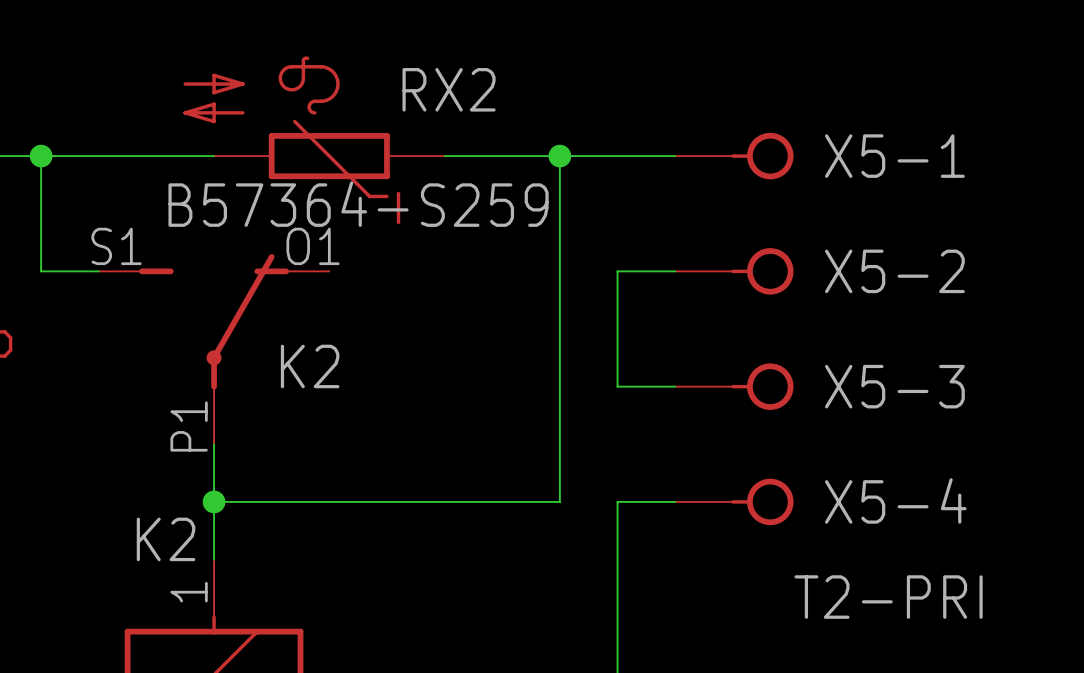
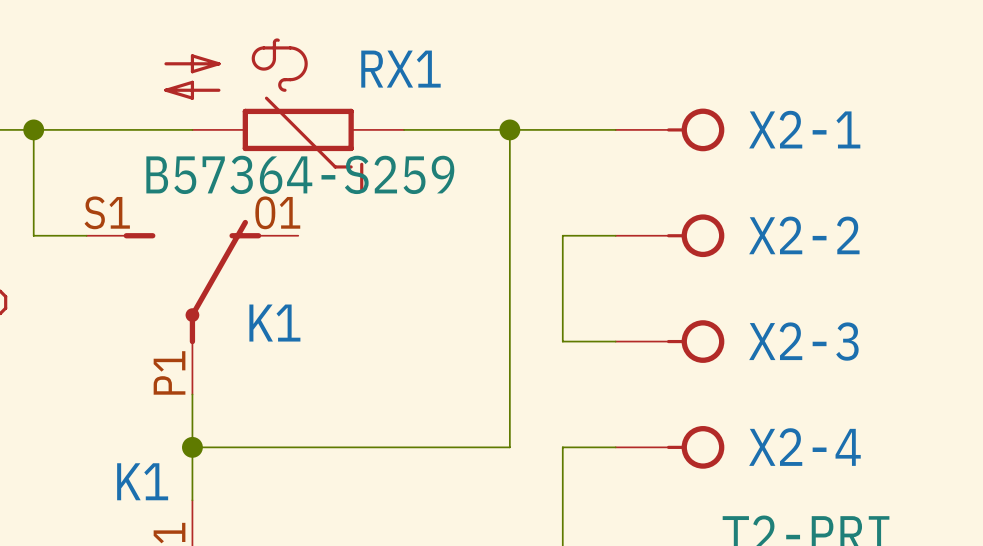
RX2 name: RX2 (449, 89) -> RX1 (400, 69)
X5-1 name: X5-1 (894, 156) -> X2-1 (804, 129)
X5-2 name: X5-2 (894, 271) -> X2-2 (804, 235)
K2 name: K2 (310, 366) -> K1 (274, 323)
X5-3 name: X5-3 (894, 386) -> X2-3 (803, 341)
X5-4 name: X5-4 (895, 500) -> X2-4 (804, 447)
K2 name: K2 (166, 539) -> K1 (142, 481)

